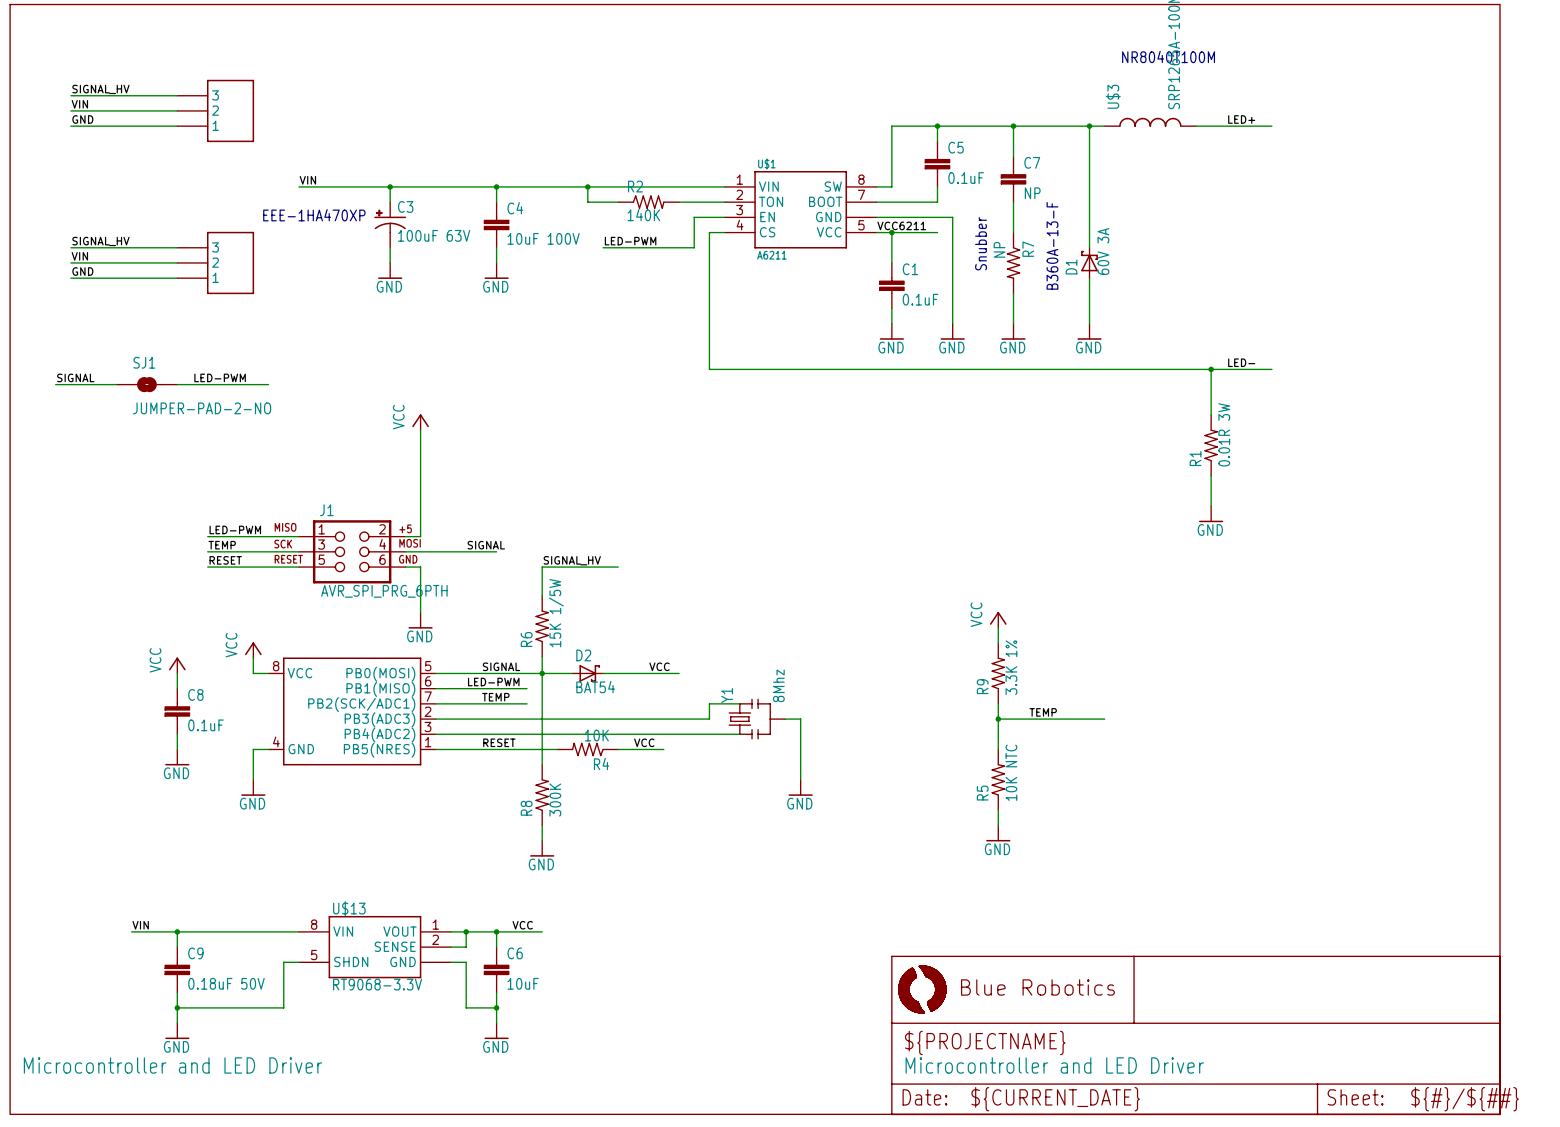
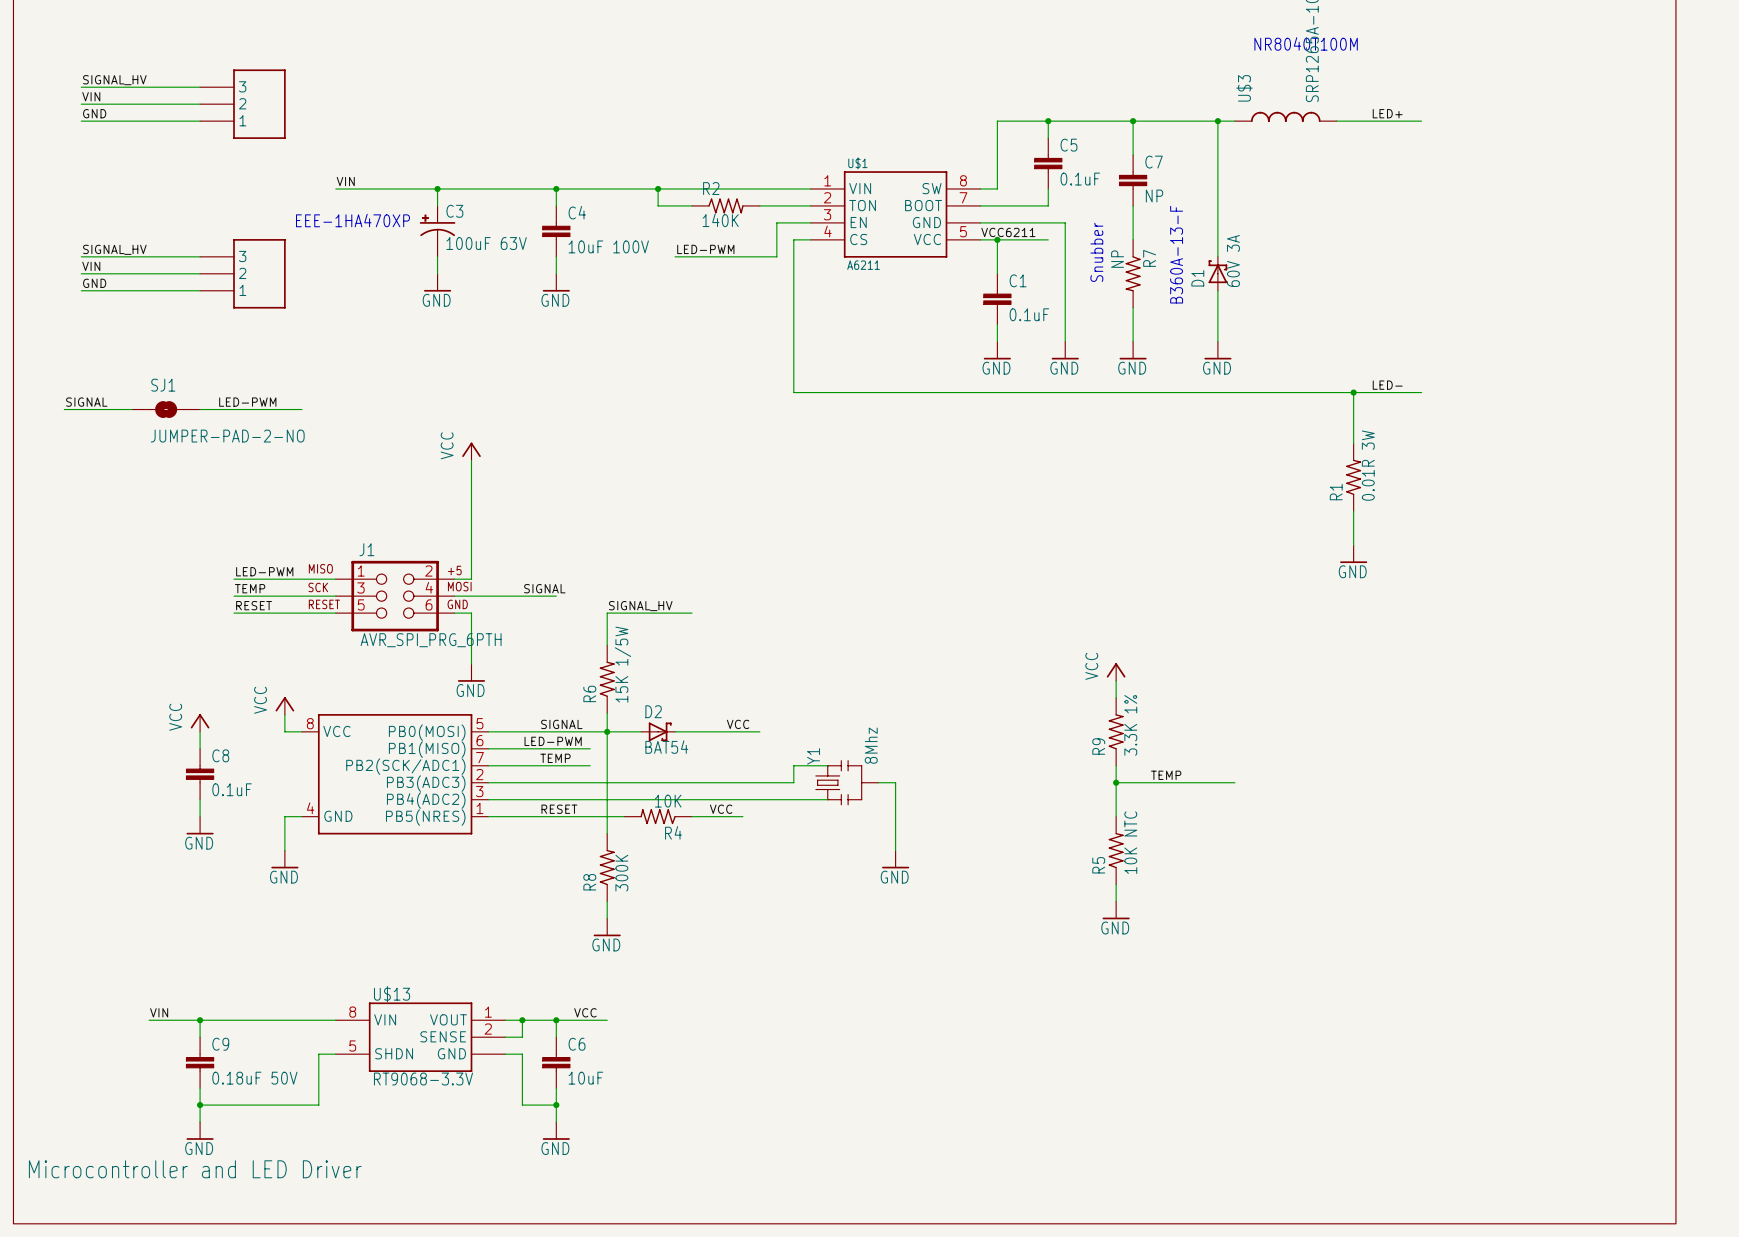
power symbol: Microcontroller and LED Driver (1195, 1035) -> none

